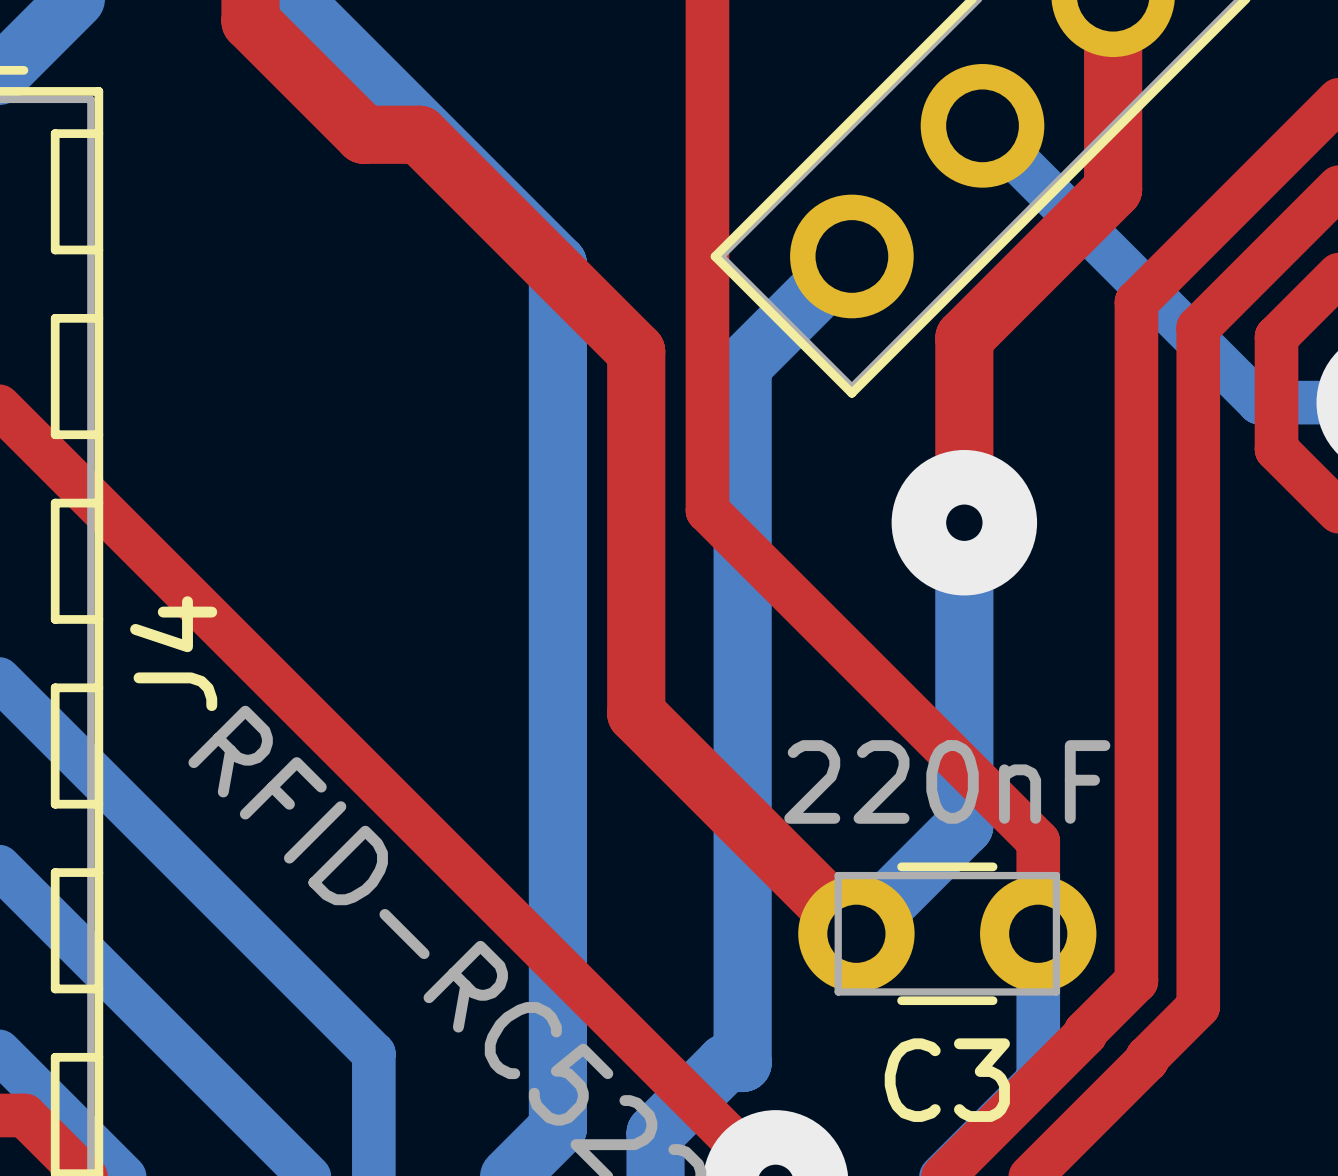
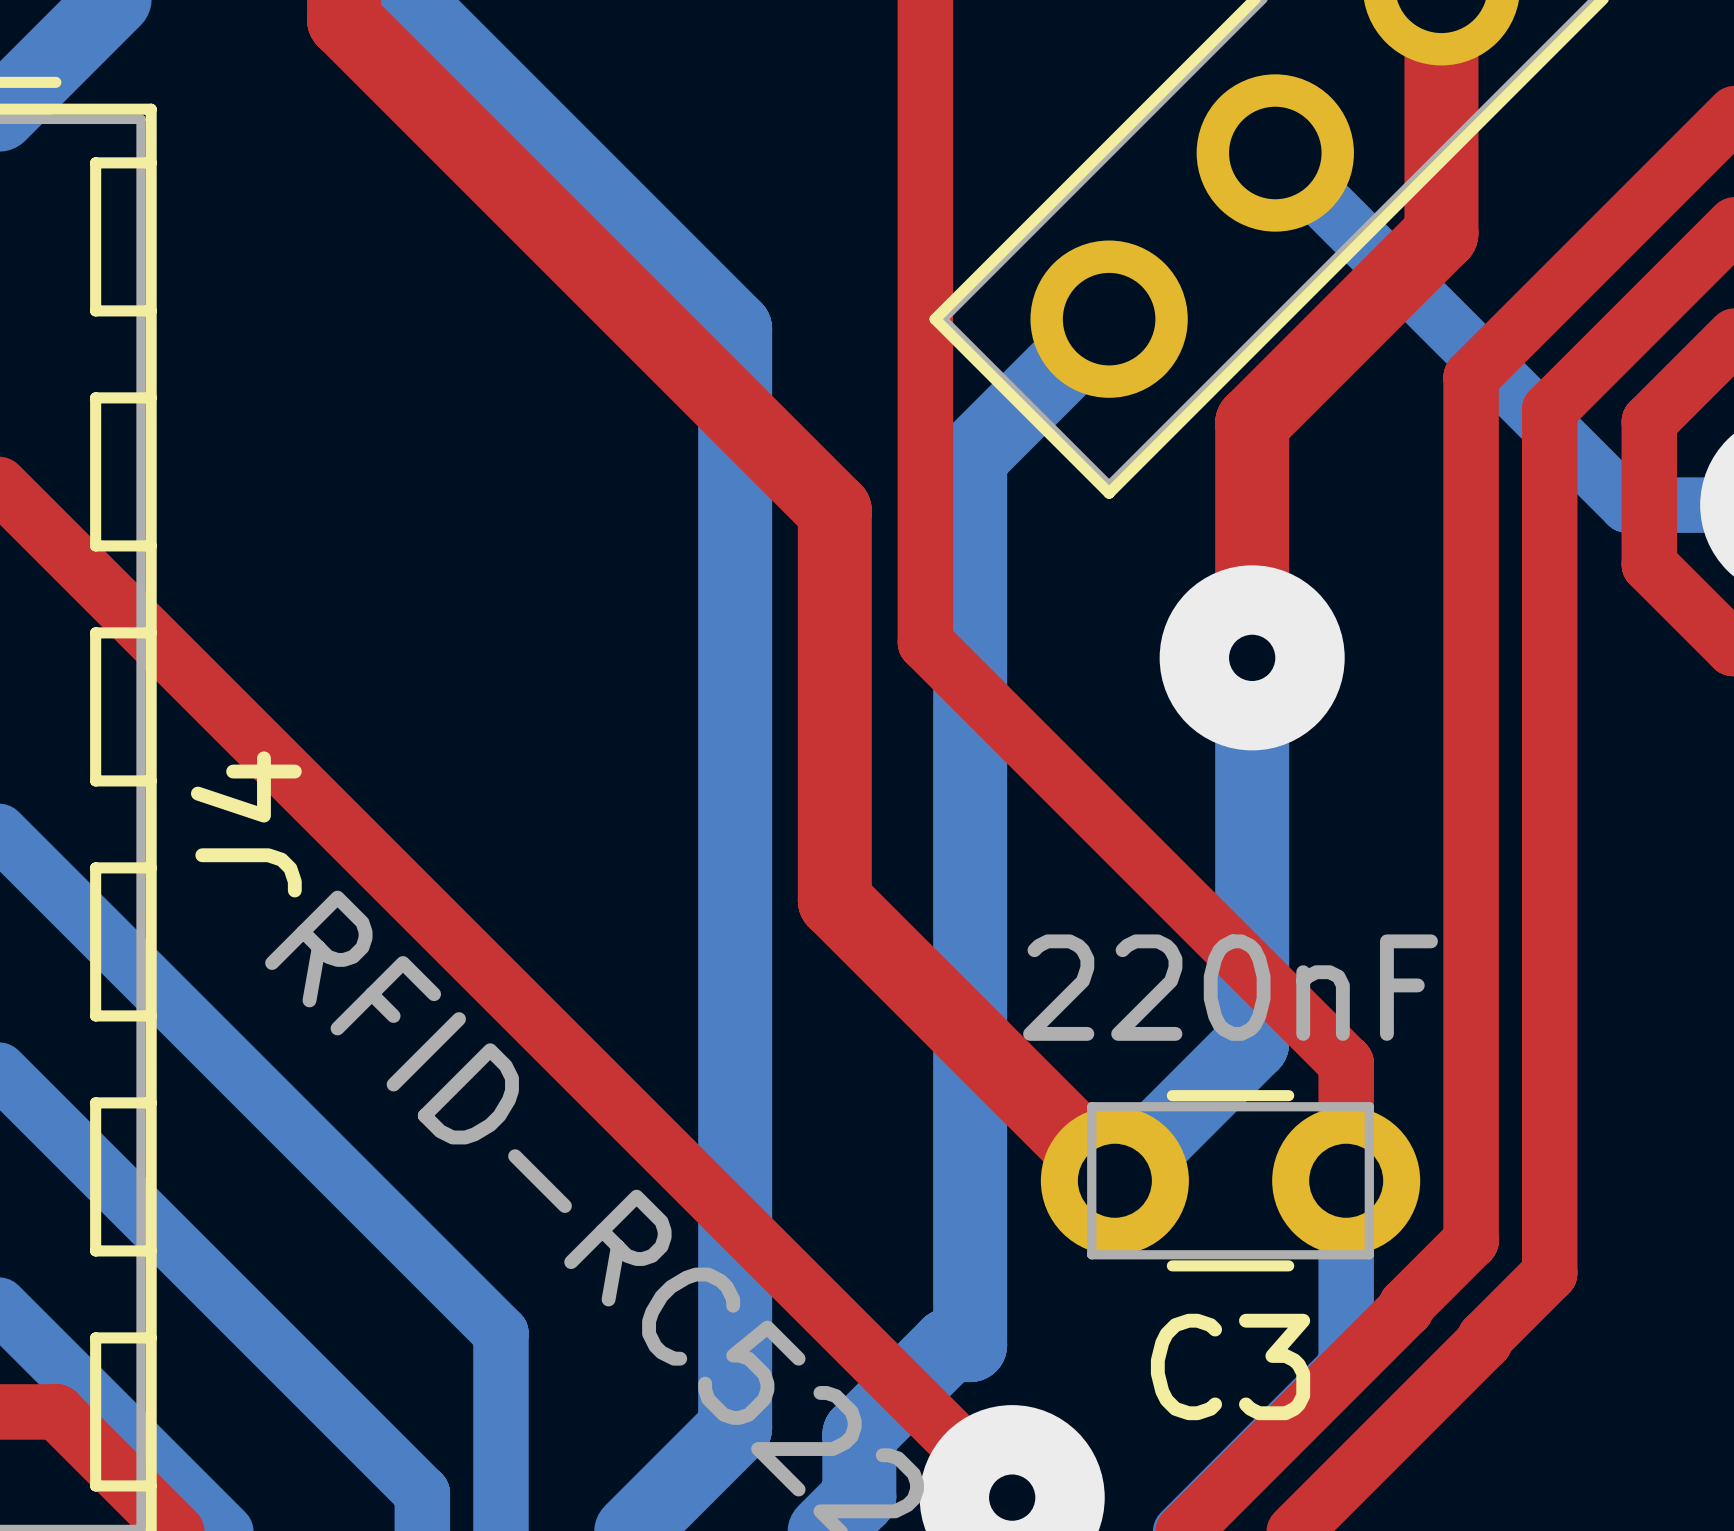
top track: (363, 134) (419, 134) (636, 351) (636, 407) -> (488, 164) (834, 510)

